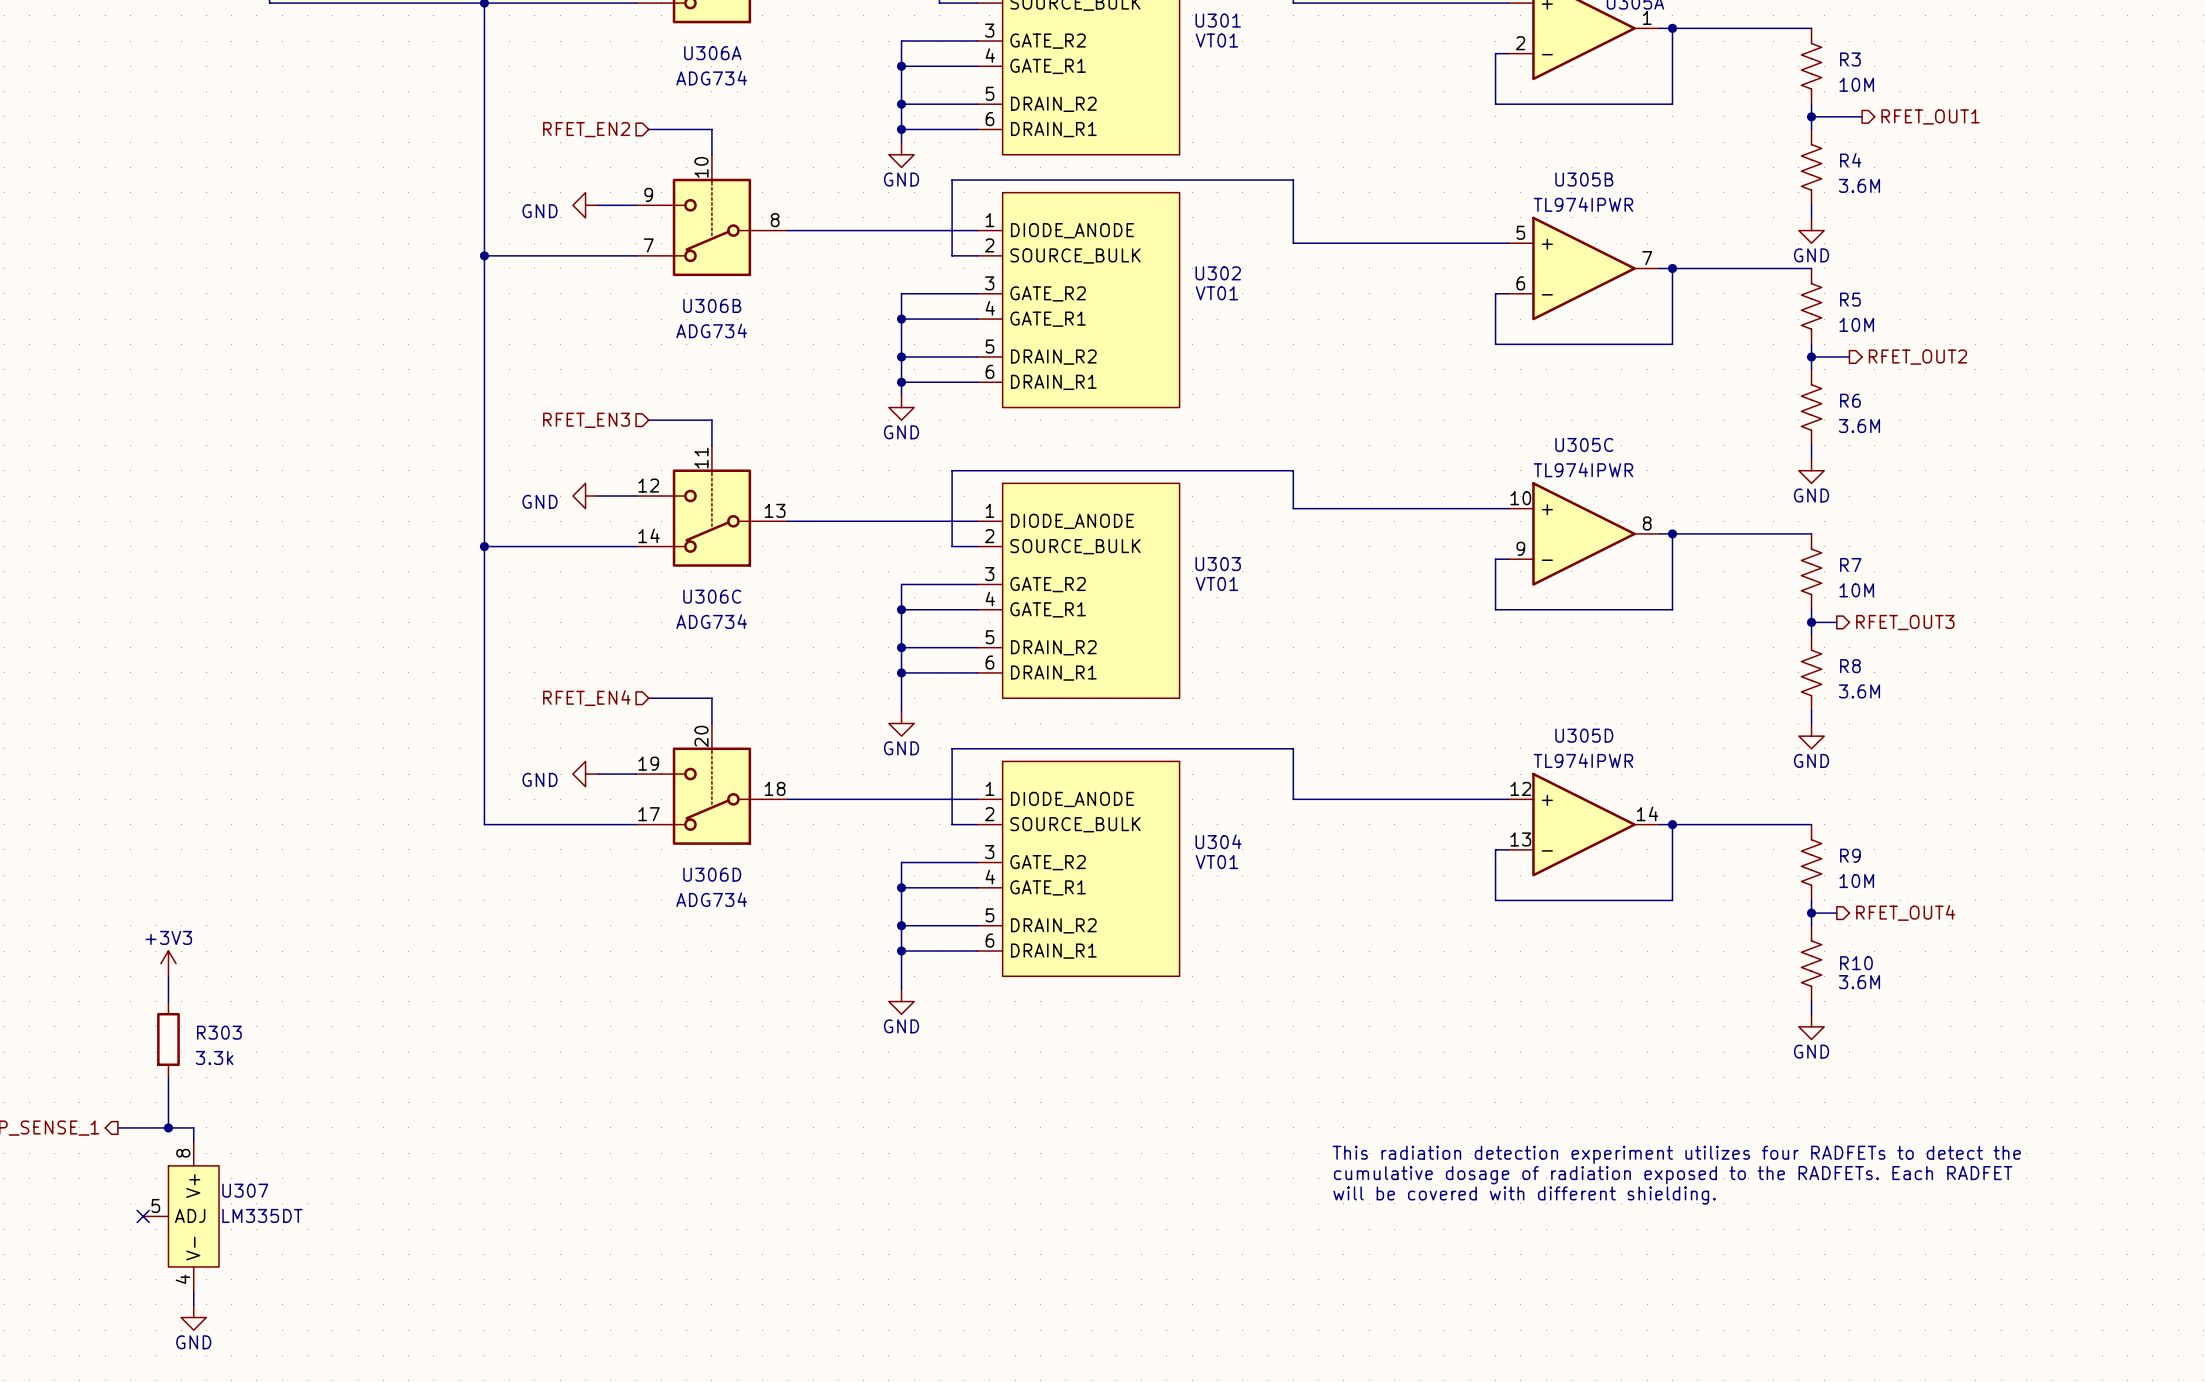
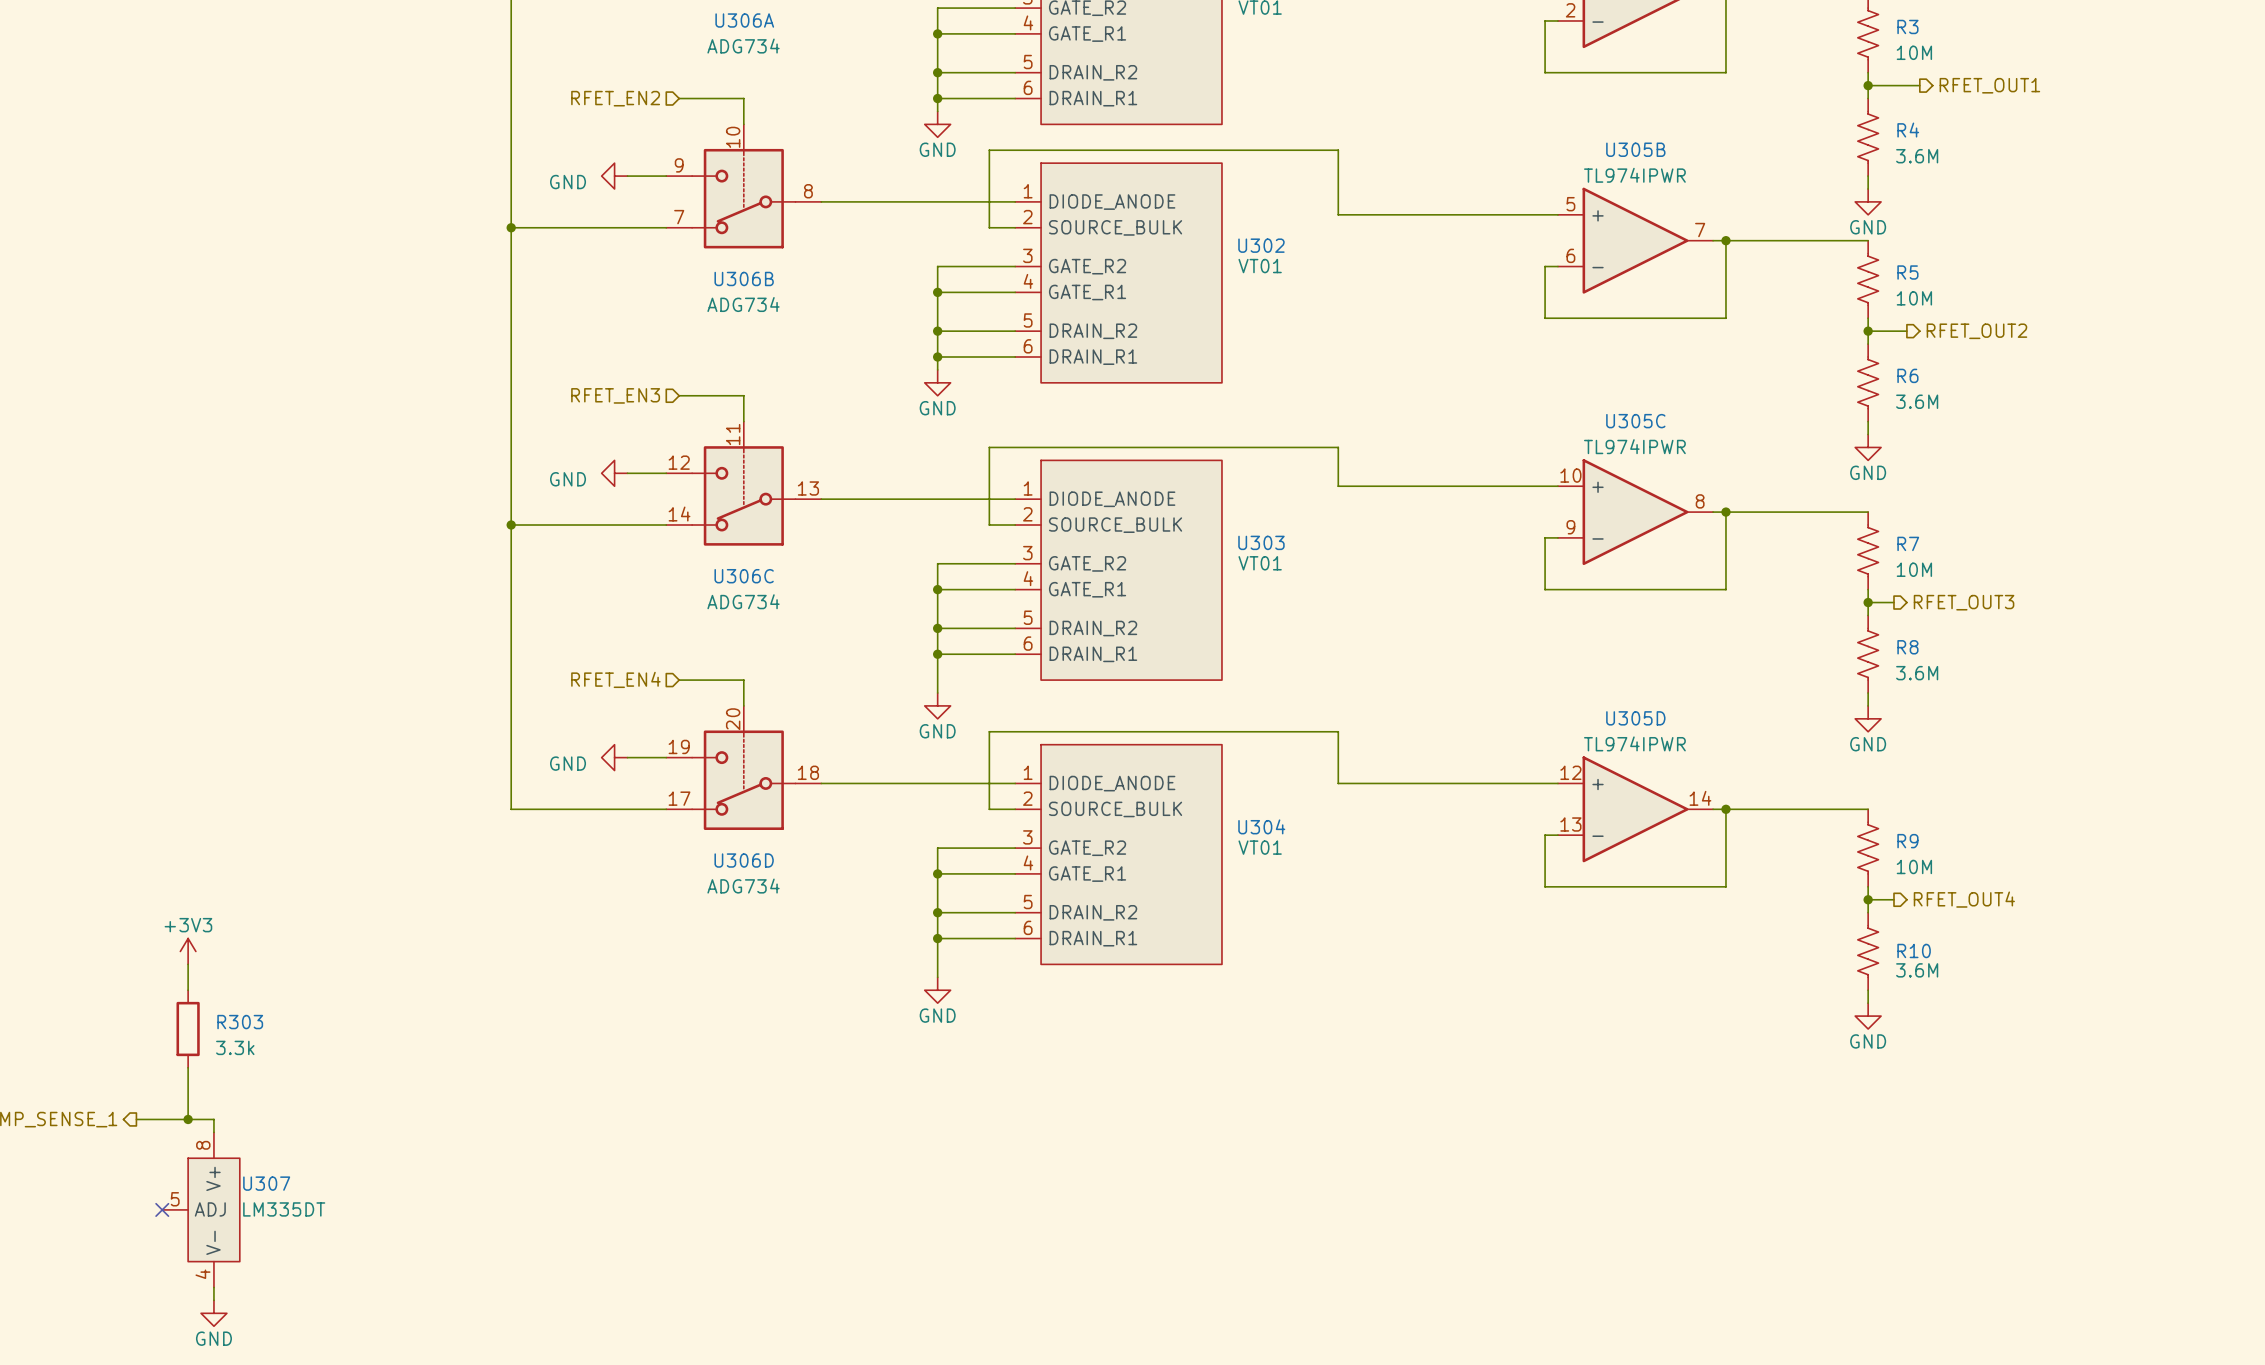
text: This radiation detection experiment utilizes four RADFETs to detect the (1676, 1154) -> none
text: cumulative dosage of radiation exposed to the RADFETs. Each RADFET (1673, 1175) -> none
text: will be covered with different shielding. (1524, 1195) -> none

